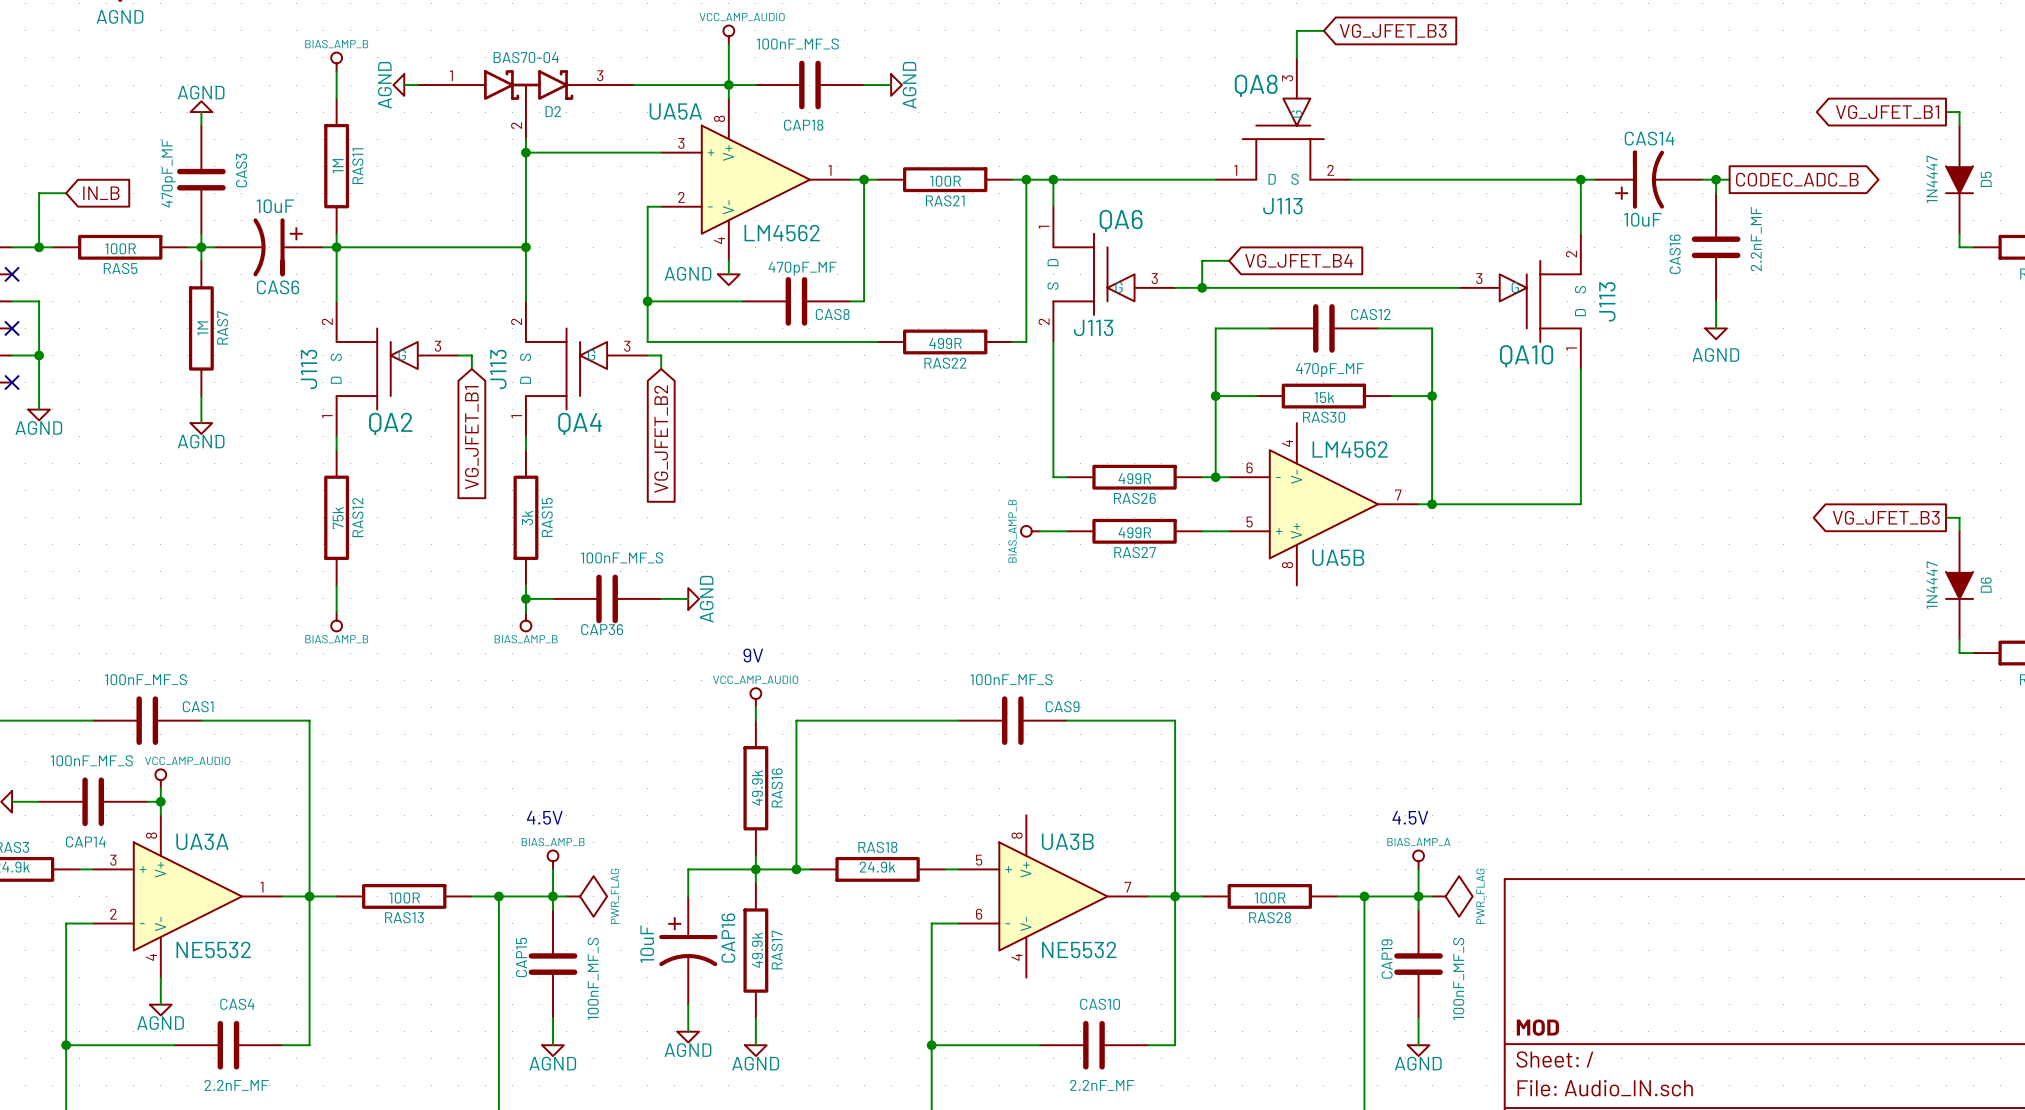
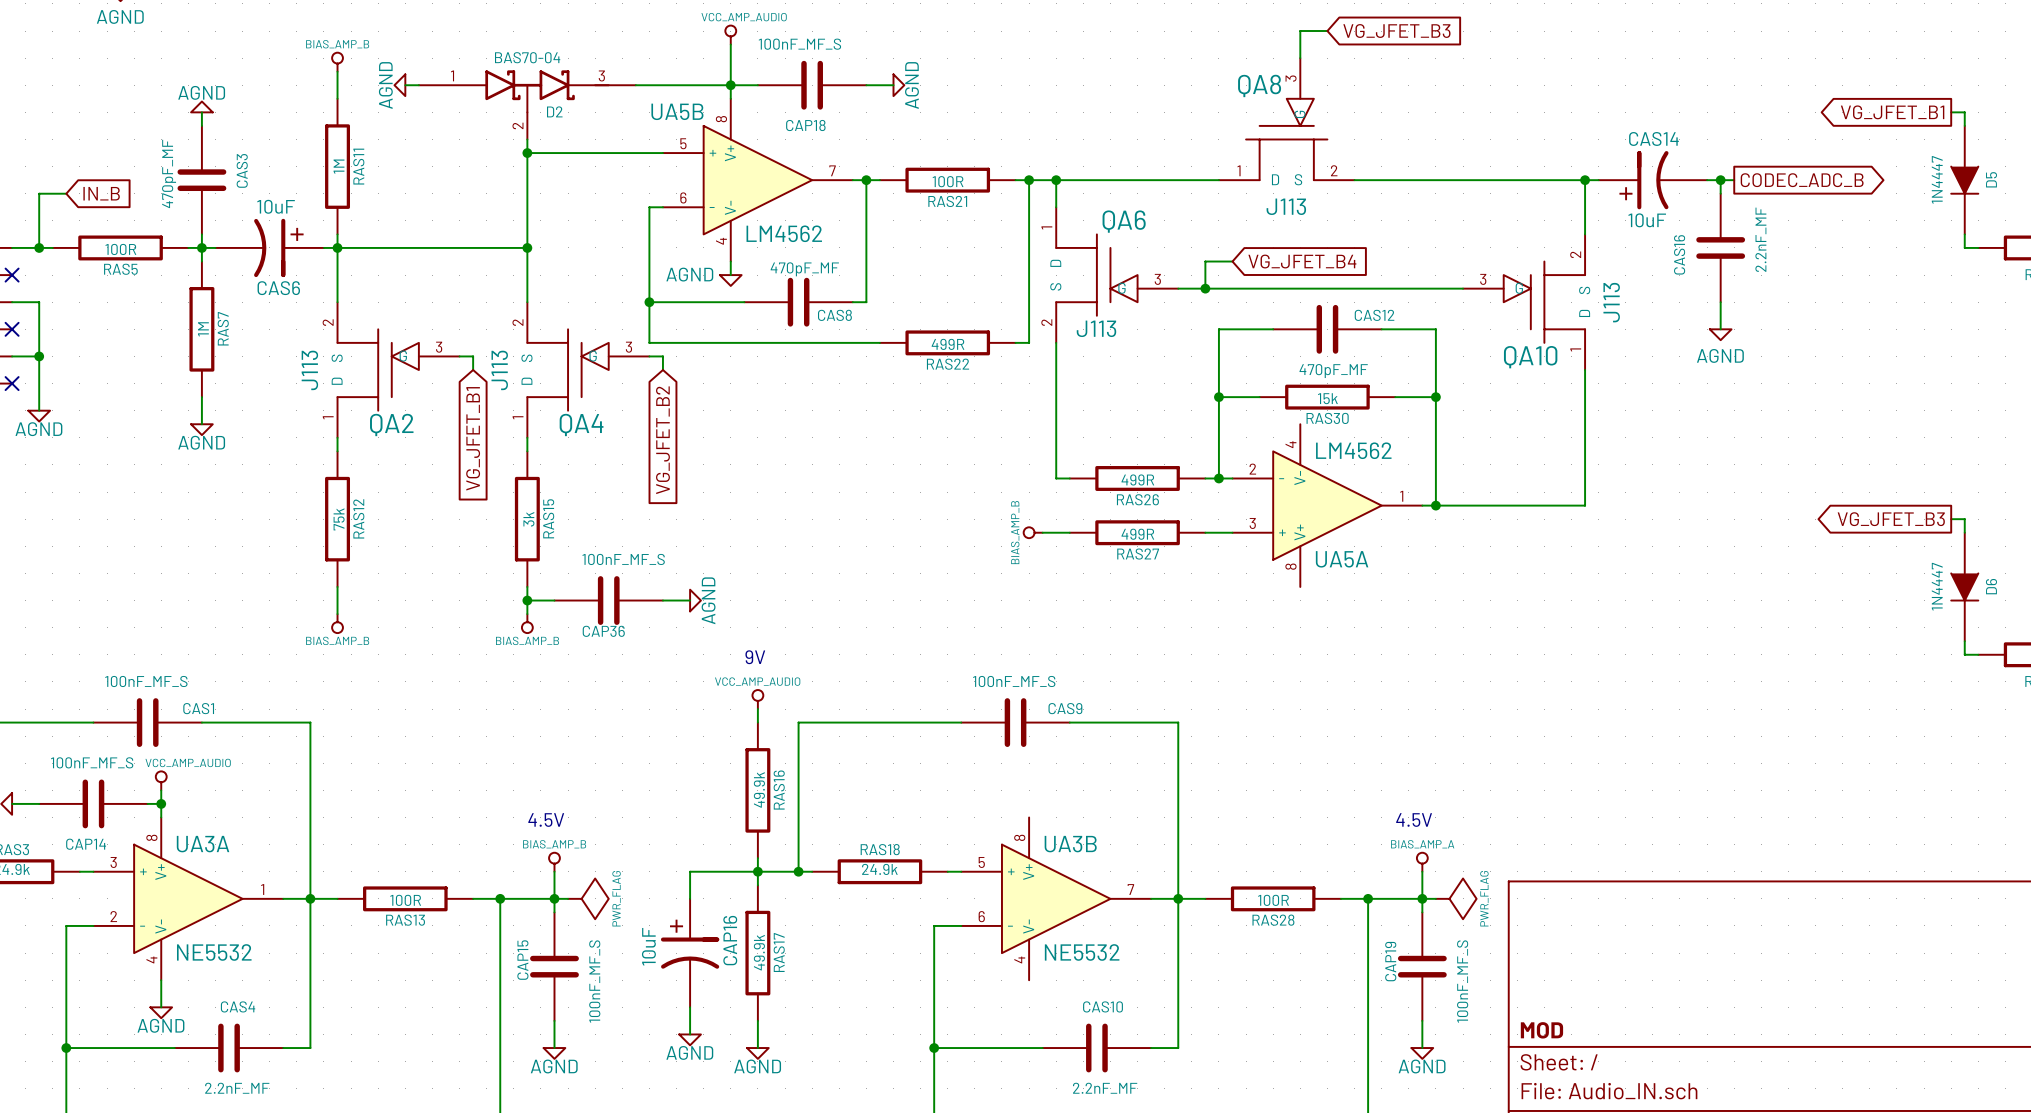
UA5A name position: UA5A (675, 111) -> UA5A (1342, 559)
UA5A flip: as is (755, 179) -> up-down (1327, 505)
UA5A position: (755, 179) -> (1327, 505)
UA5B flip: as is (1323, 504) -> up-down (757, 180)
UA5B position: (1323, 504) -> (757, 180)
UA5B name position: UA5B (1338, 557) -> UA5B (677, 111)

